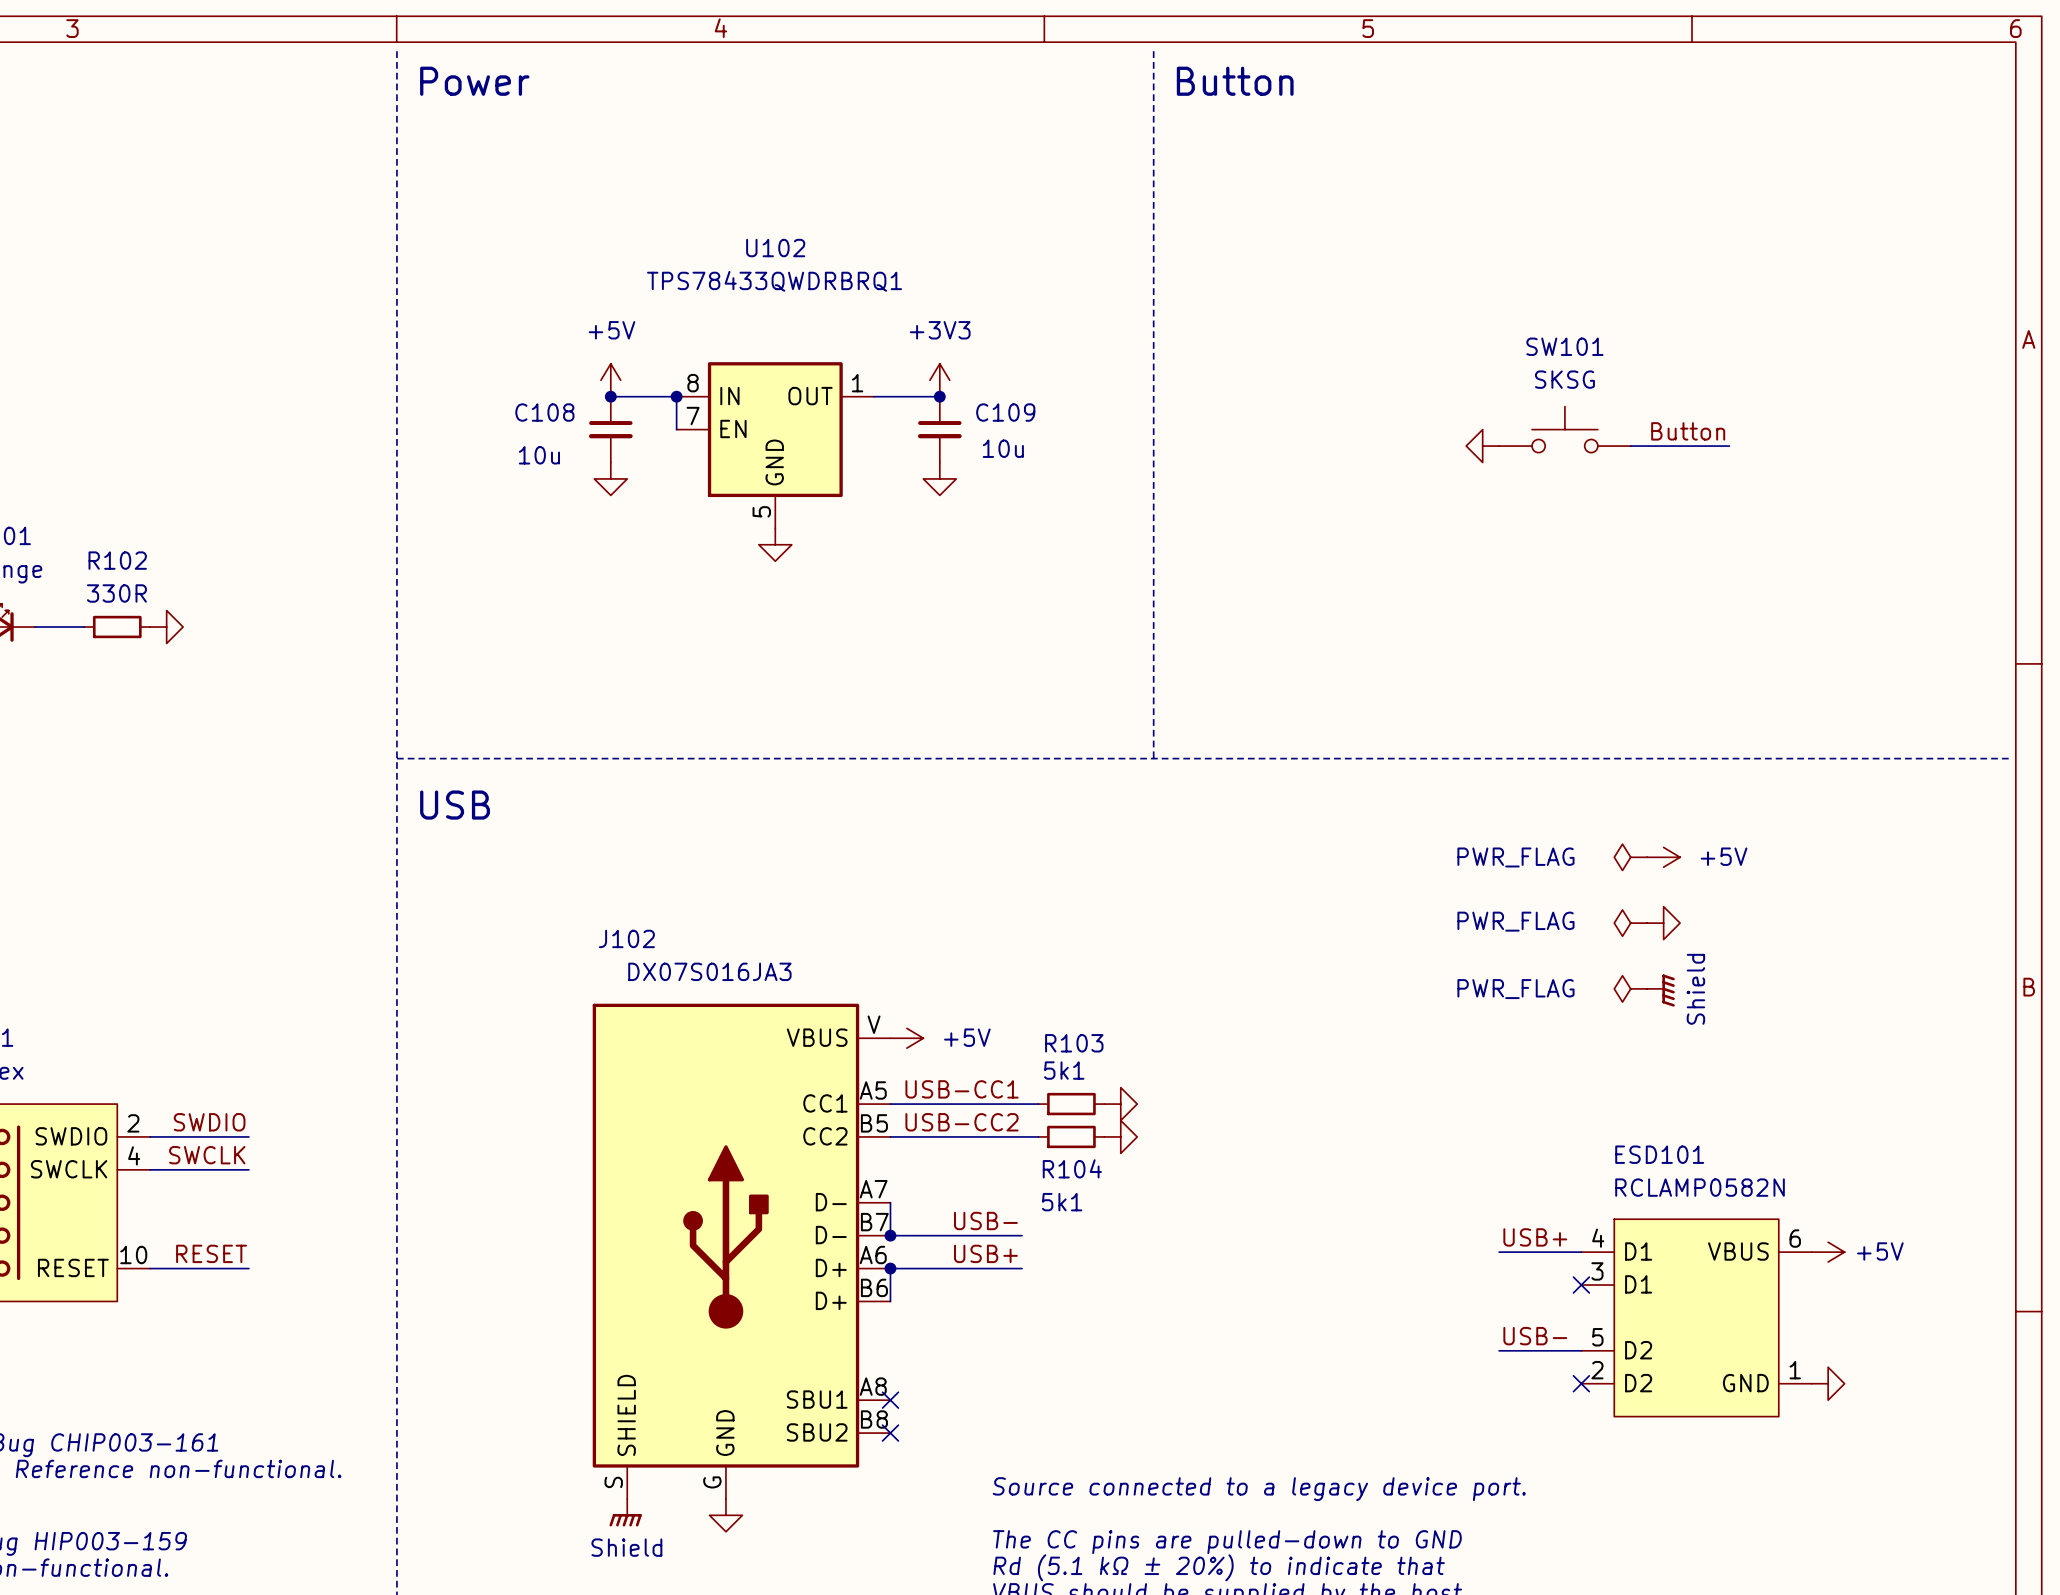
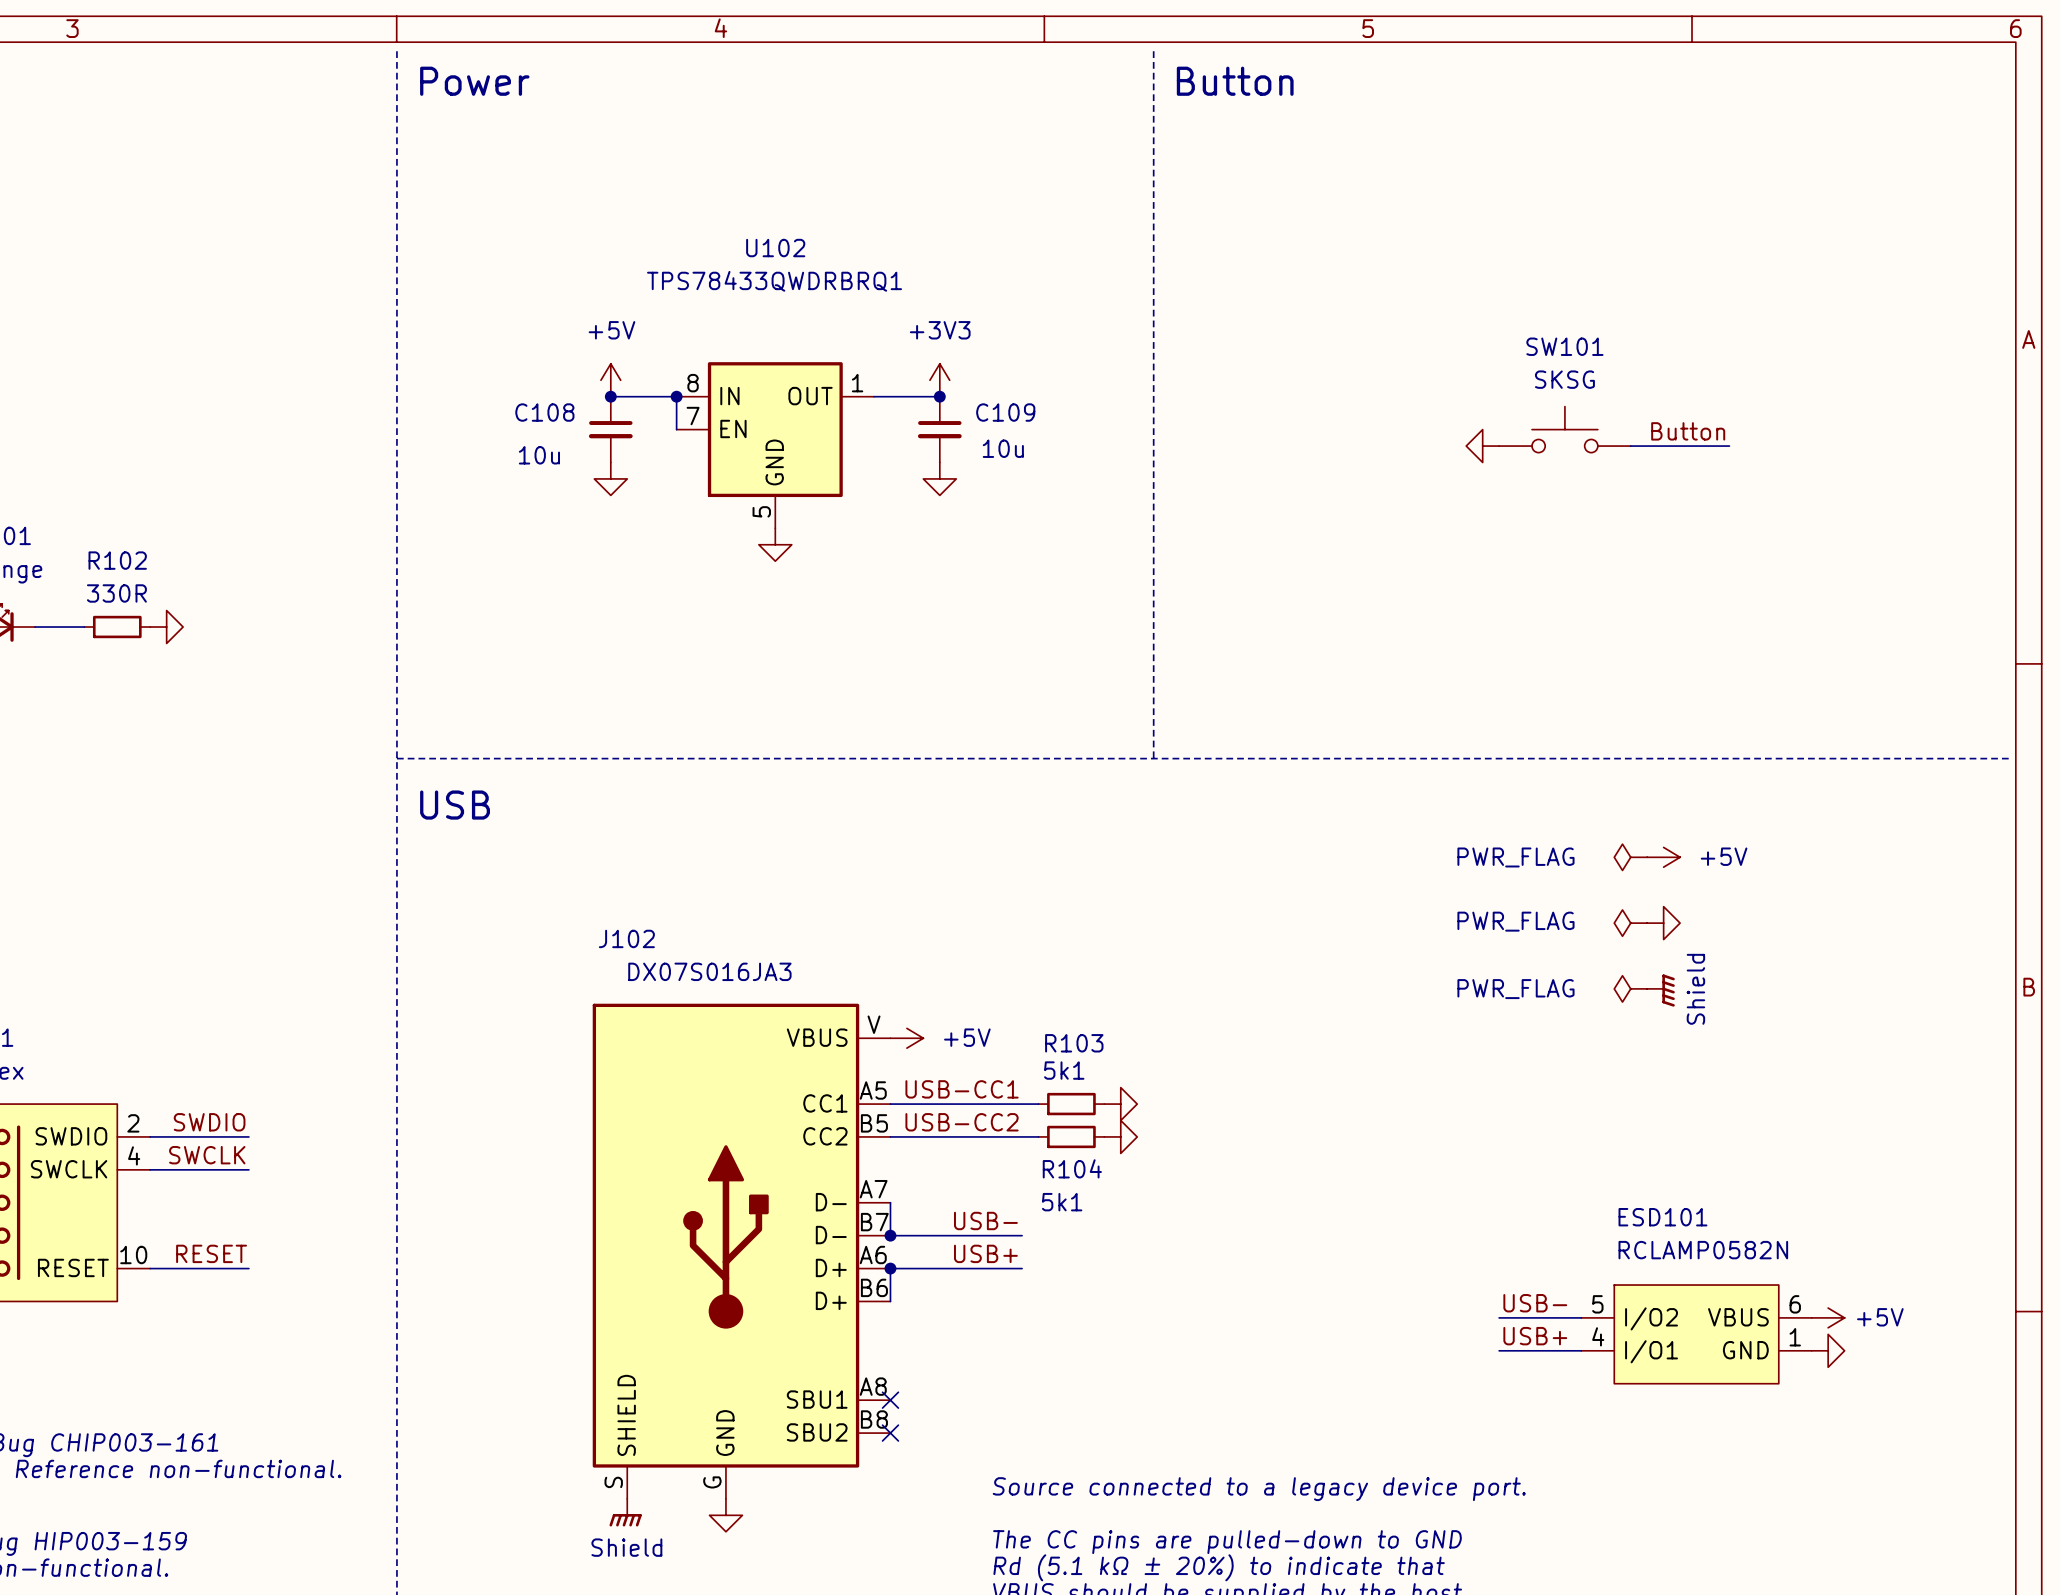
ESD101 name position: ESD101 (1659, 1154) -> ESD101 (1662, 1217)
ESD101 value position: RCLAMP0582N (1700, 1187) -> RCLAMP0582N (1703, 1250)
ESD101 symbol: [1581, 1219, 1812, 1417] -> [1581, 1285, 1812, 1384]
label: USB+ (1535, 1237) -> none
wire: (1499, 1252) (1581, 1252) -> (1499, 1317) (1581, 1317)
power symbol position: +5V (1828, 1252) -> +5V (1828, 1317)
no-connect mark: (1581, 1285) -> none
label: none -> USB- (1535, 1303)
label: USB- (1535, 1336) -> USB+ (1535, 1336)
no-connect mark: (1581, 1383) -> none
power symbol position: (1828, 1383) -> (1828, 1350)

